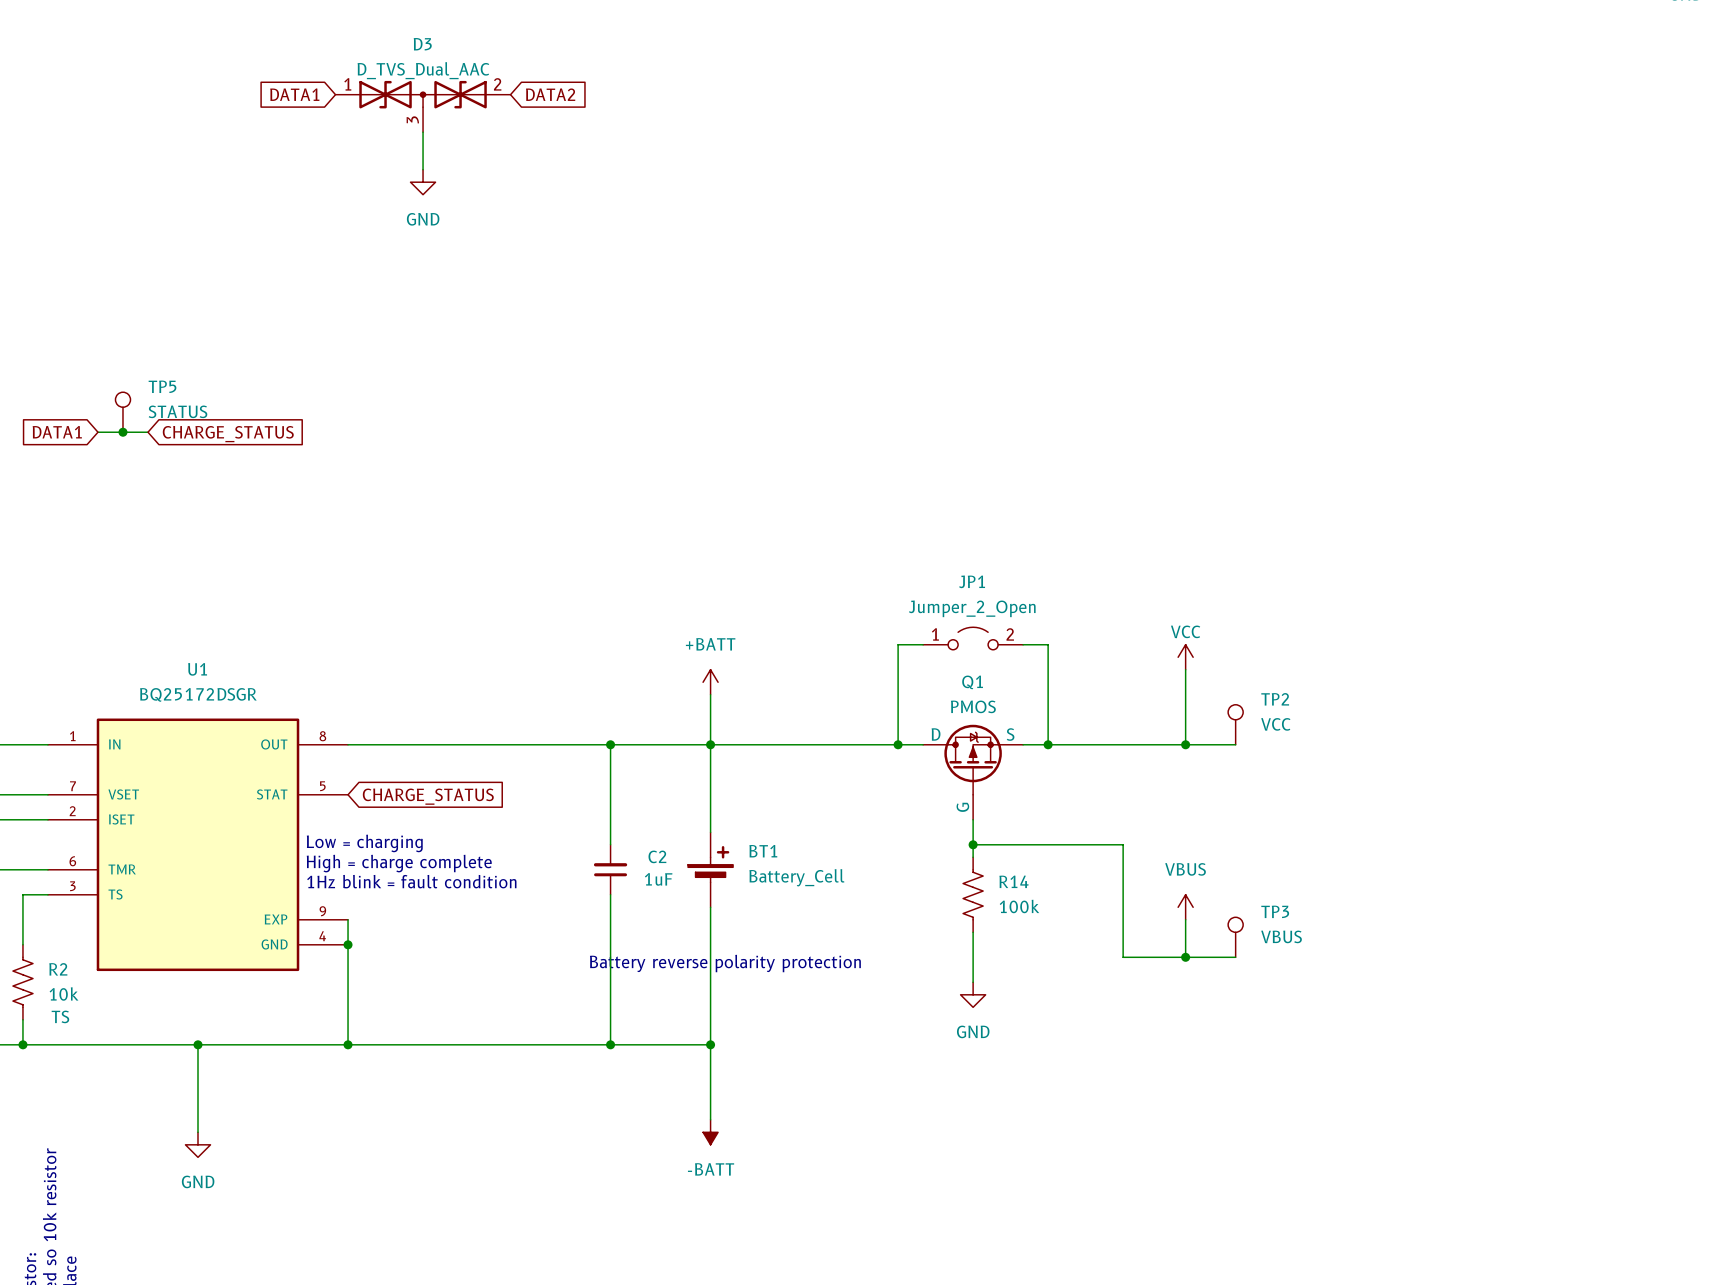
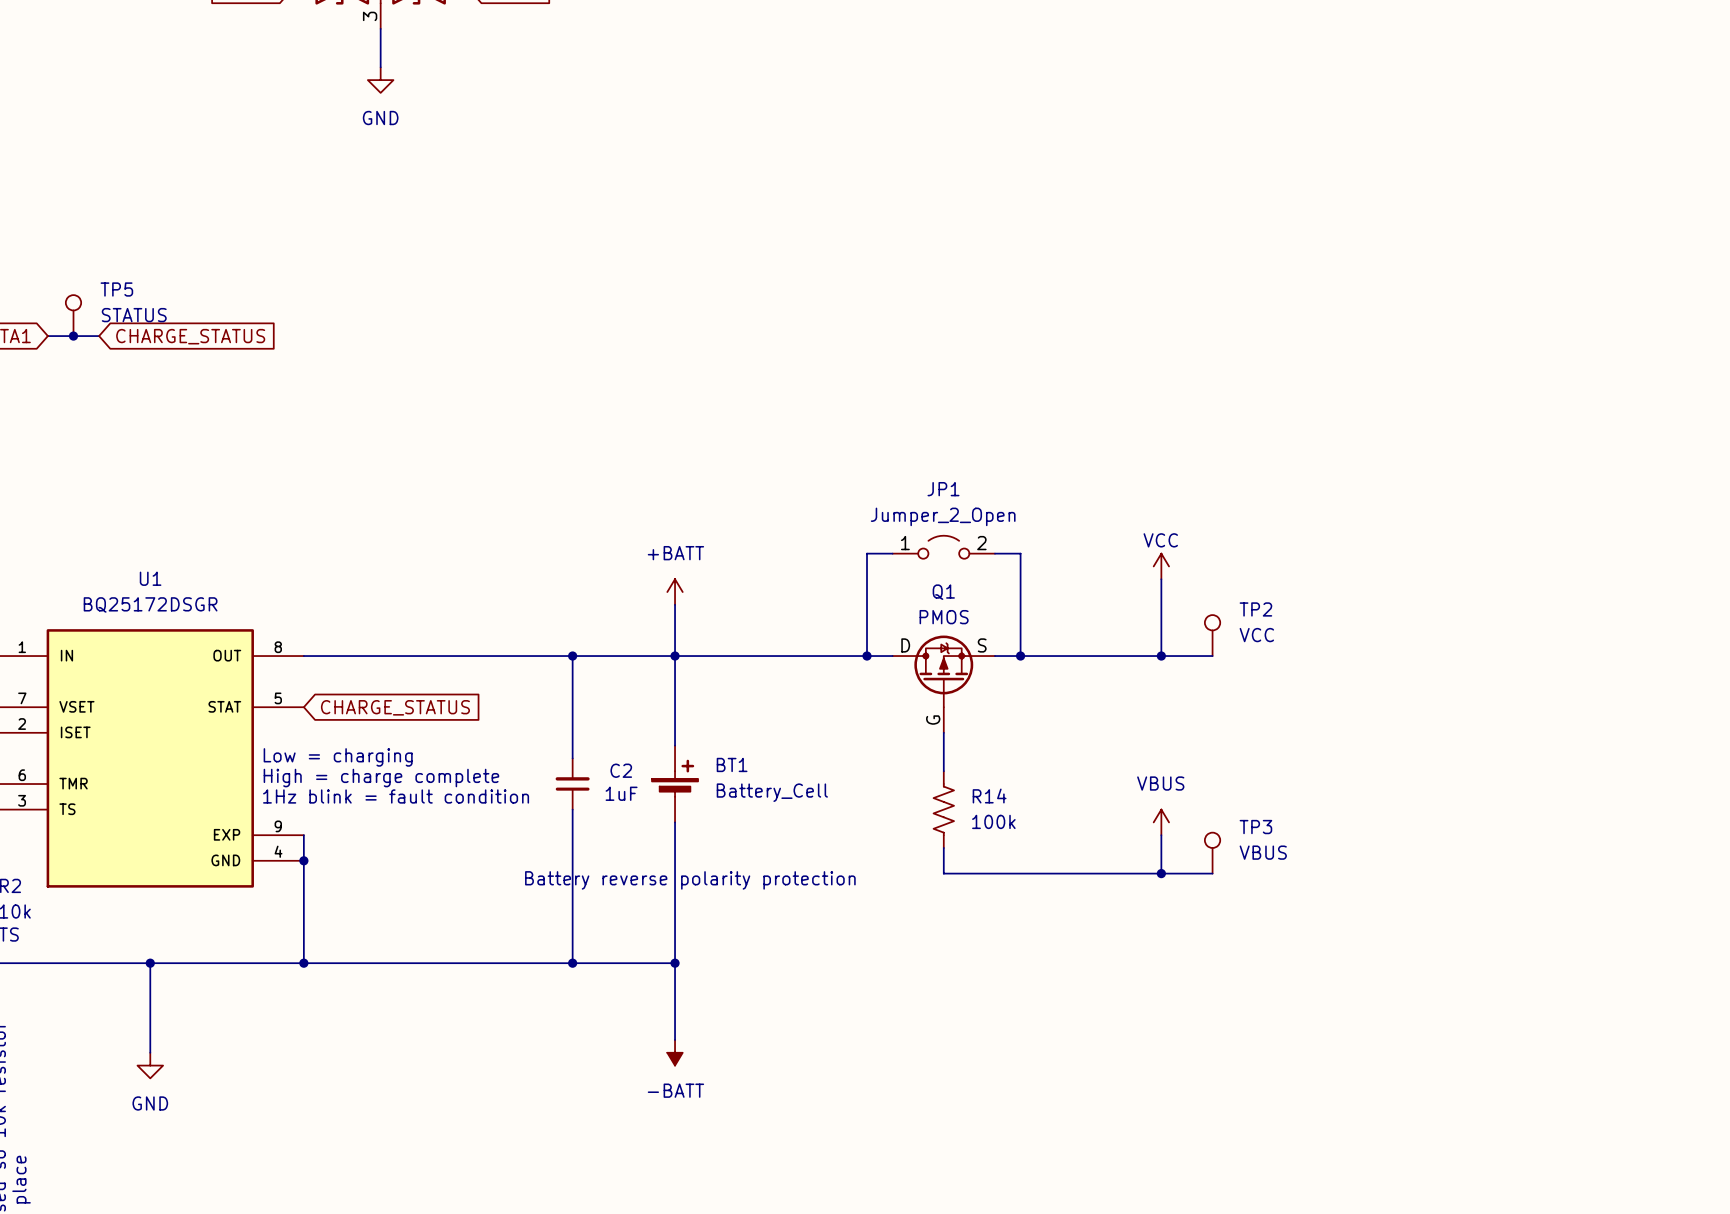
wire: (973, 844) (1123, 844) (1123, 957) -> (943, 873) (1097, 873)
junction: (973, 844) -> none
wire: (973, 957) (973, 982) -> none
power symbol: GND (973, 994) -> none

